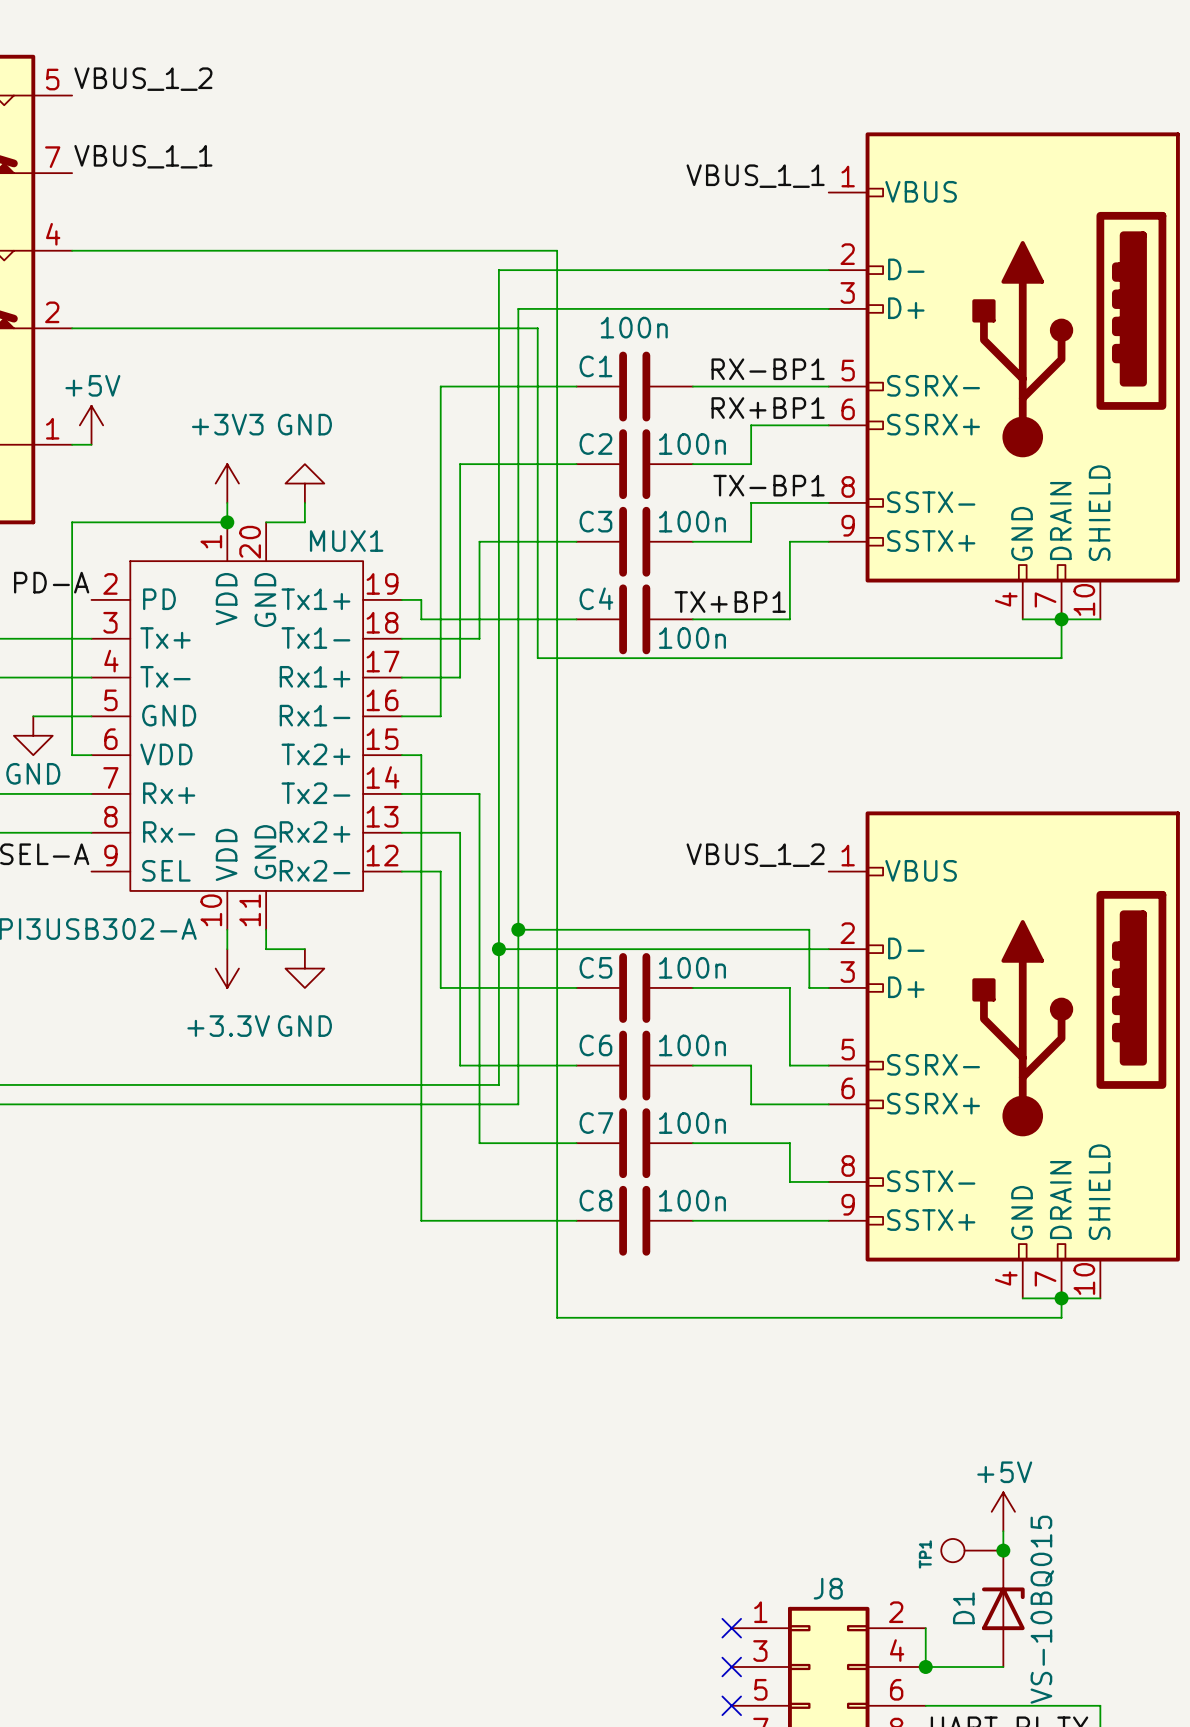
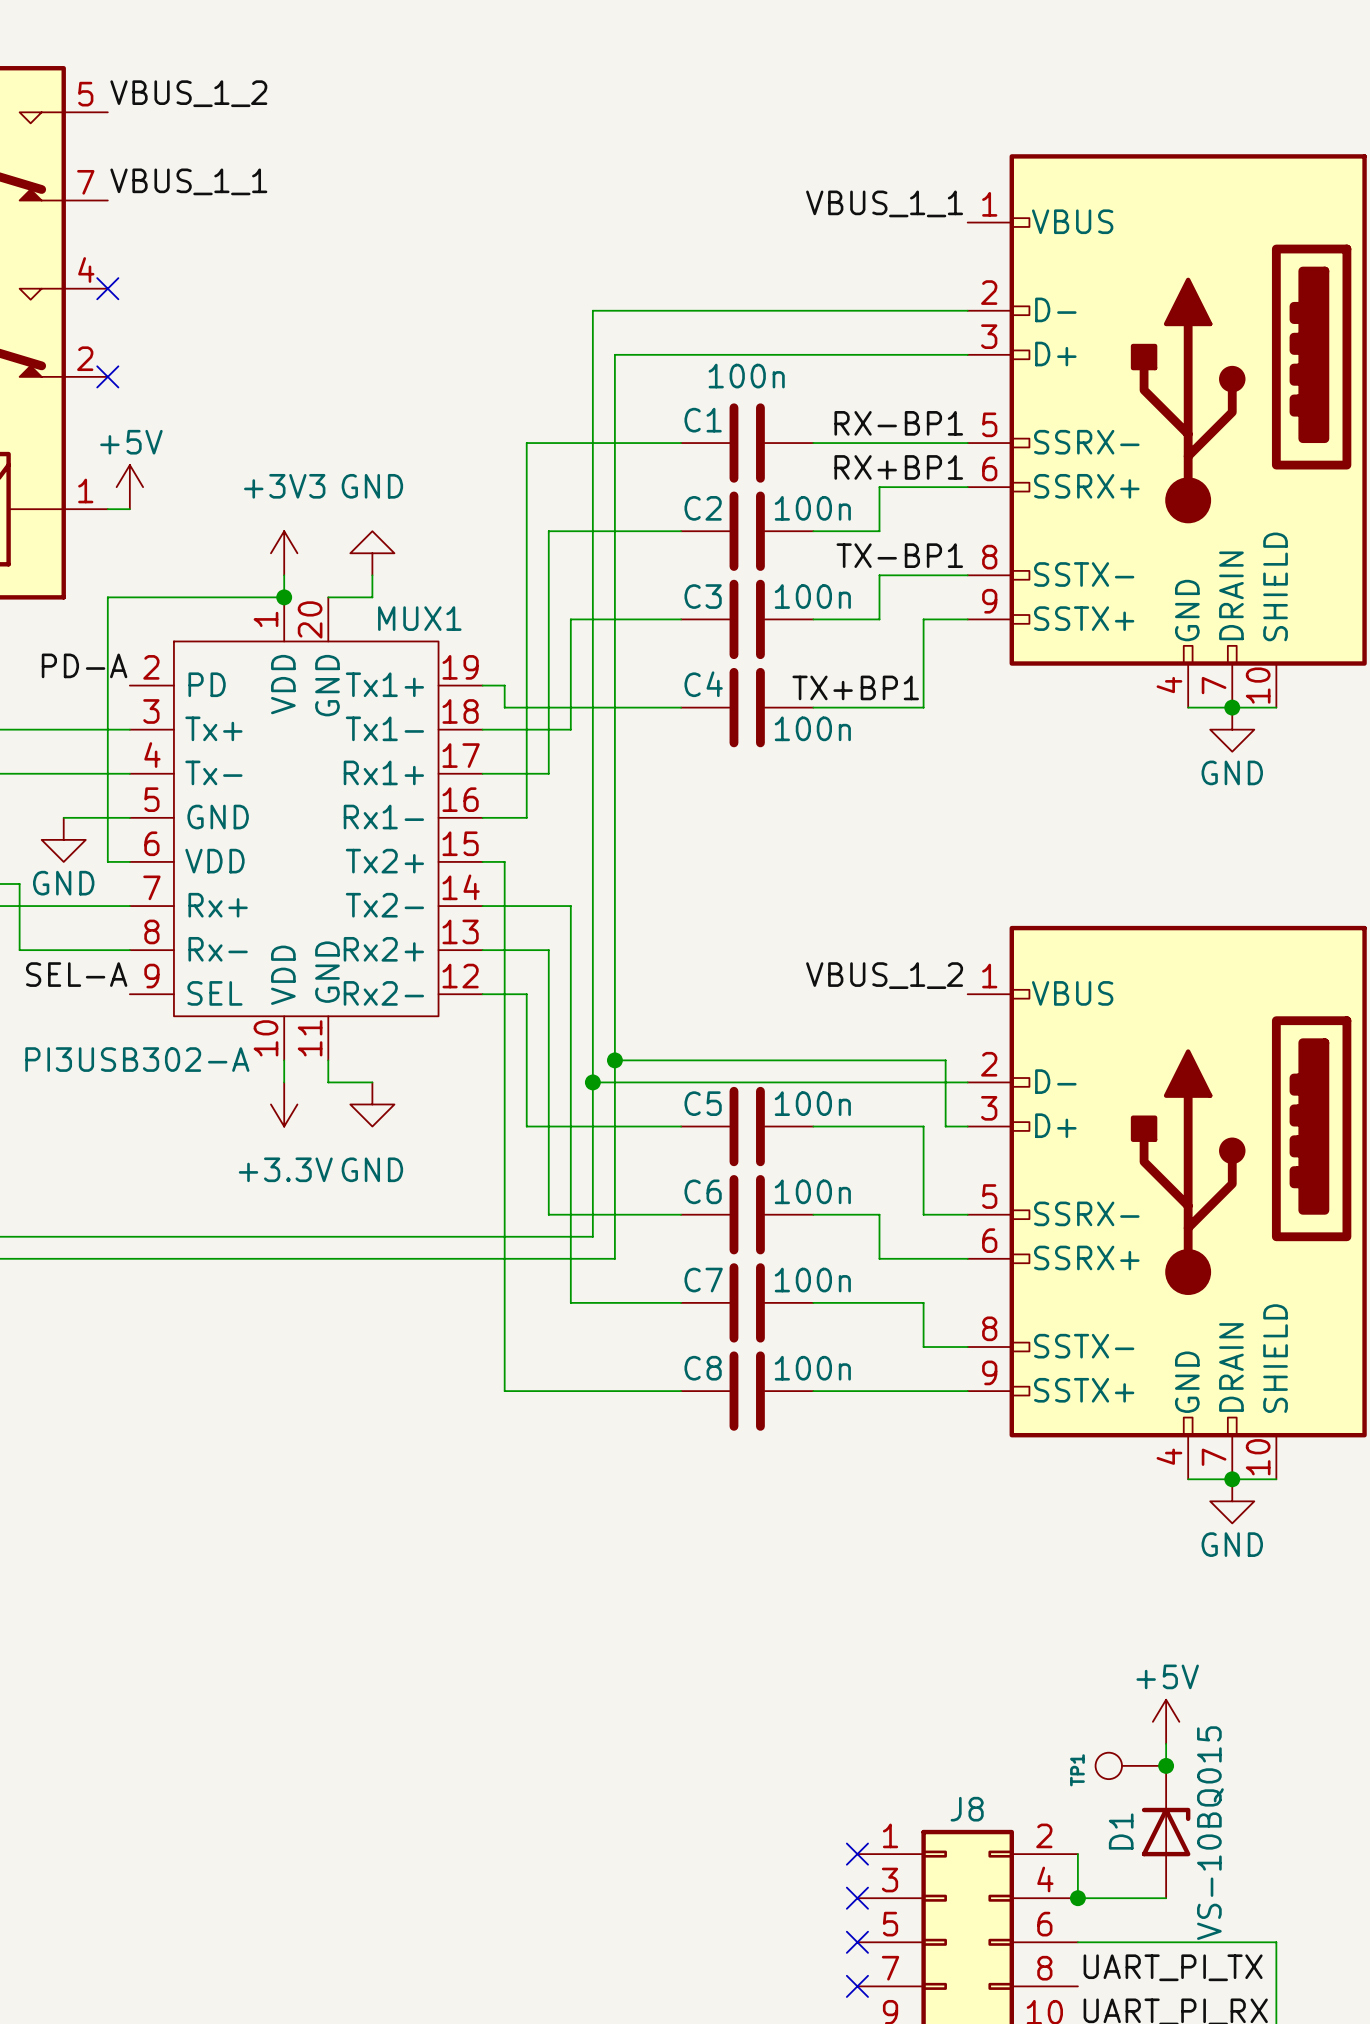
wire: (72, 250) (557, 250) (557, 1317) (1061, 1317) (1061, 1298) -> none
no-connect mark: none -> (107, 288)
wire: (72, 328) (537, 328) (537, 658) (1061, 658) (1061, 619) -> none
no-connect mark: none -> (107, 376)
power symbol: none -> GND (1232, 729)
power symbol: none -> GND (1232, 1501)

